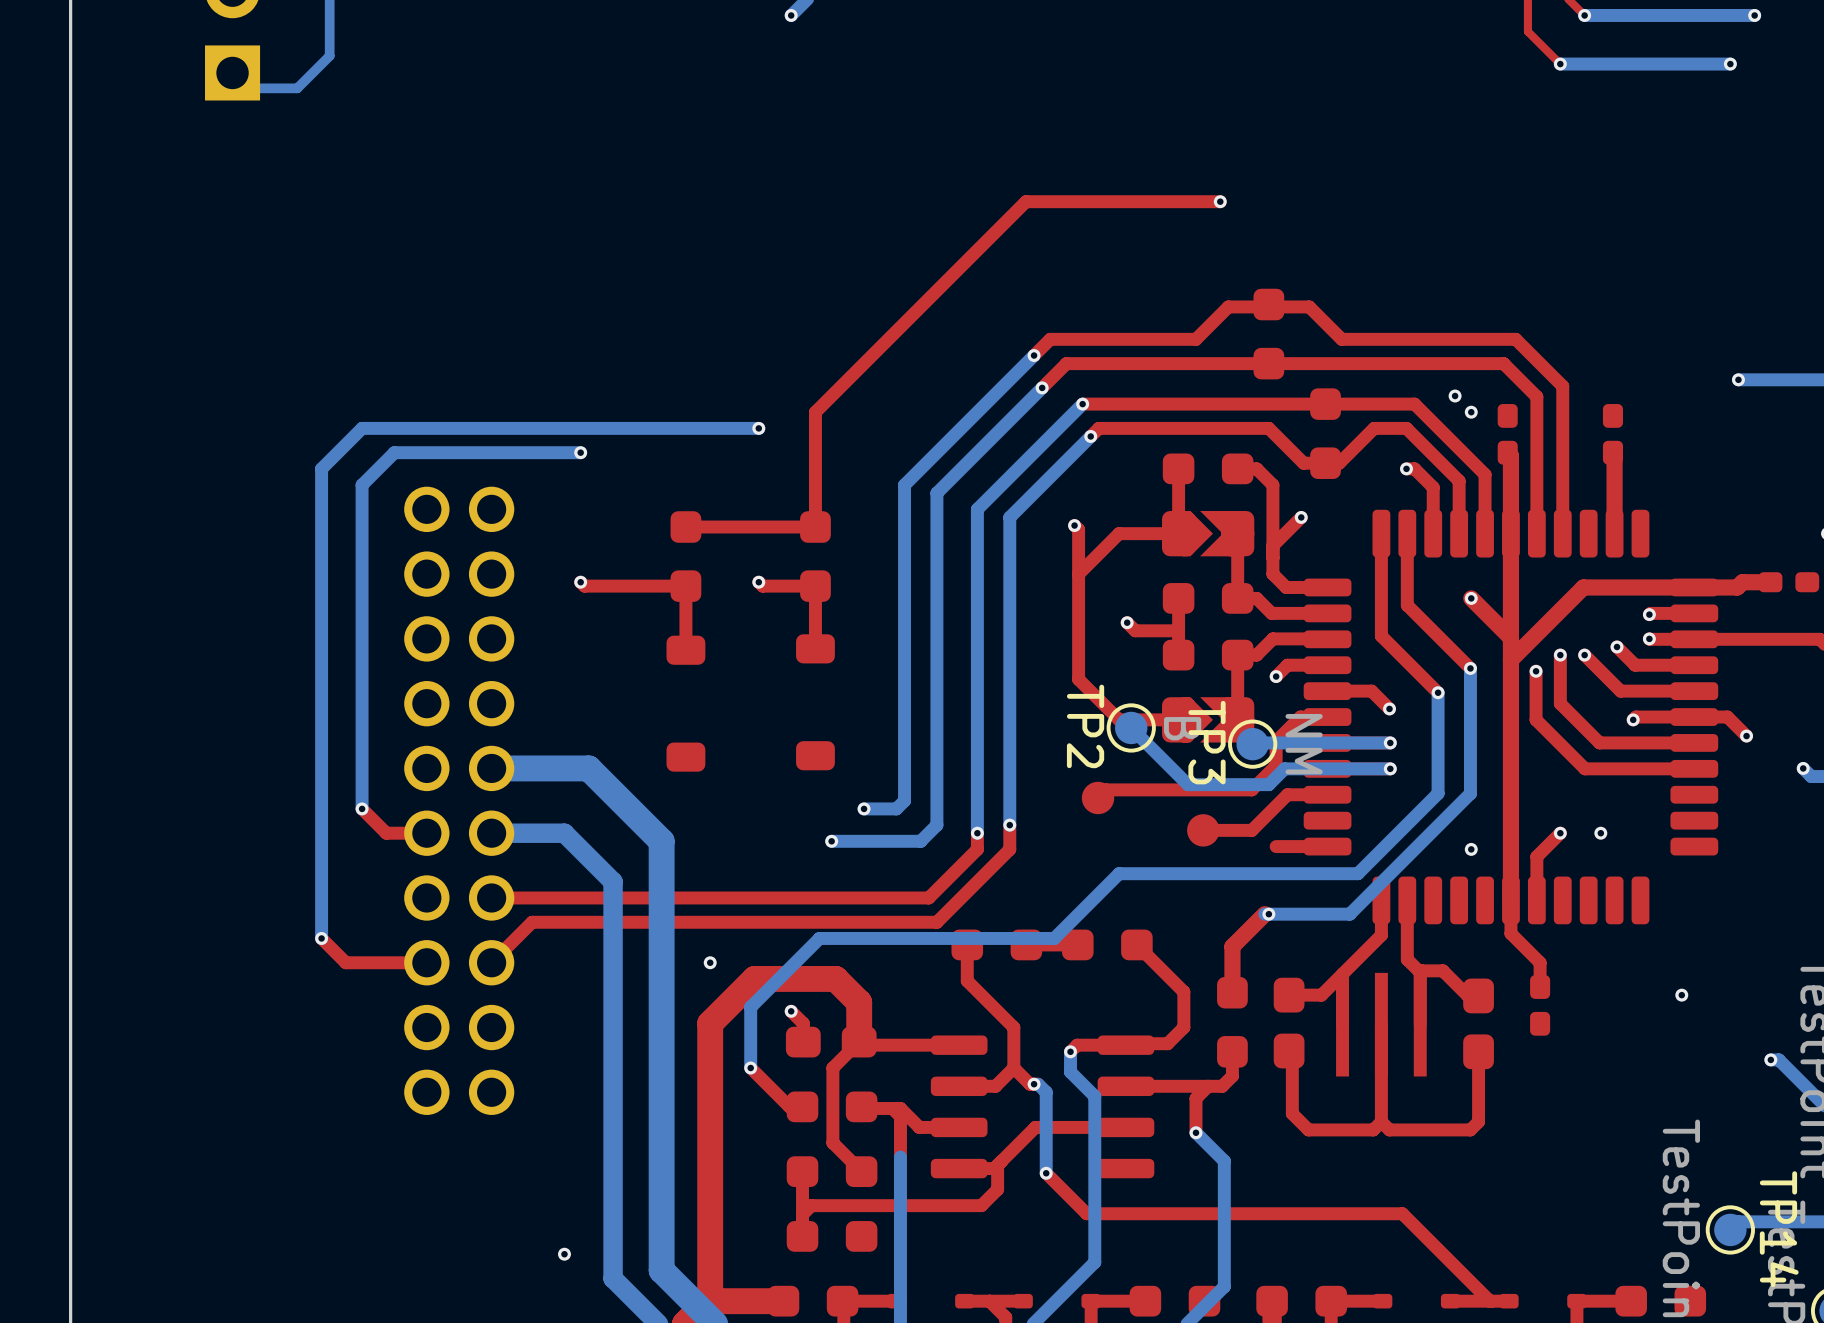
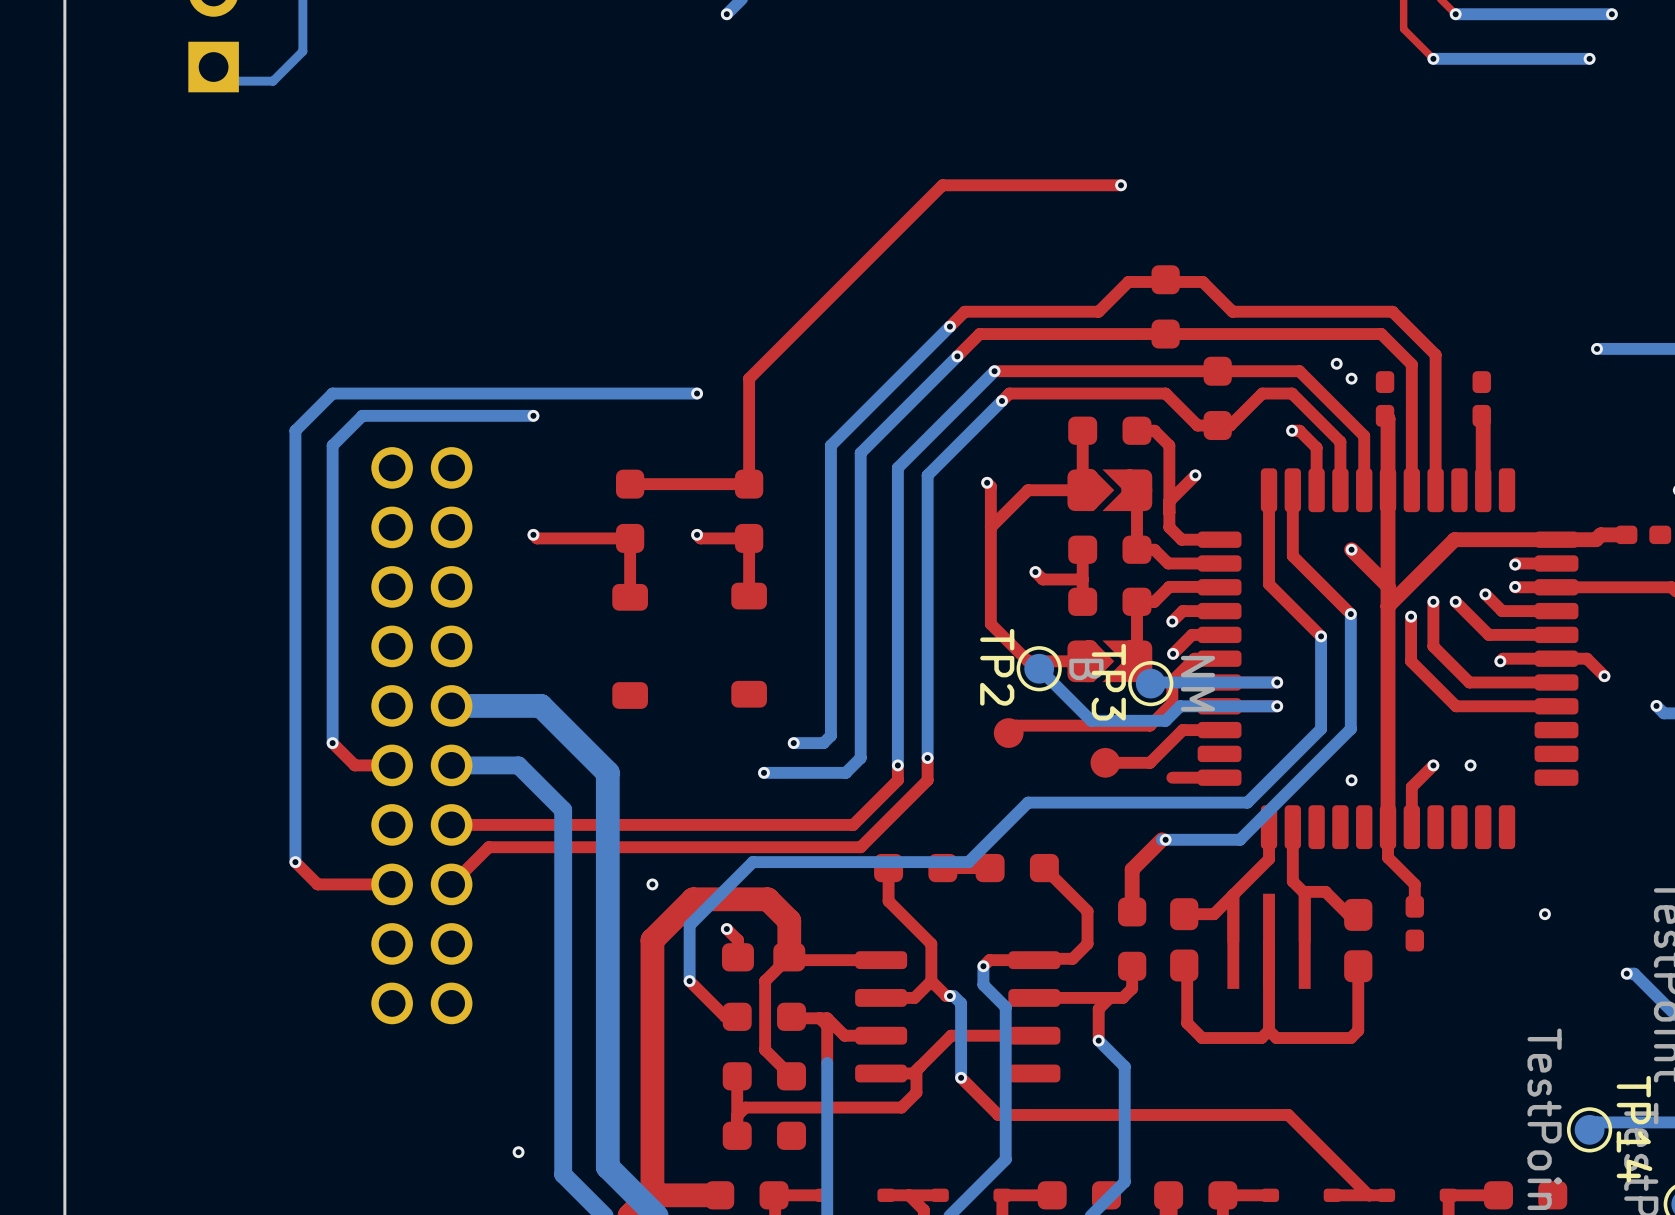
top track: (1327, 691) (1371, 691) (1389, 708) -> (1219, 634) (1192, 634) (1173, 653)
via position: (1389, 708) -> (1173, 653)

